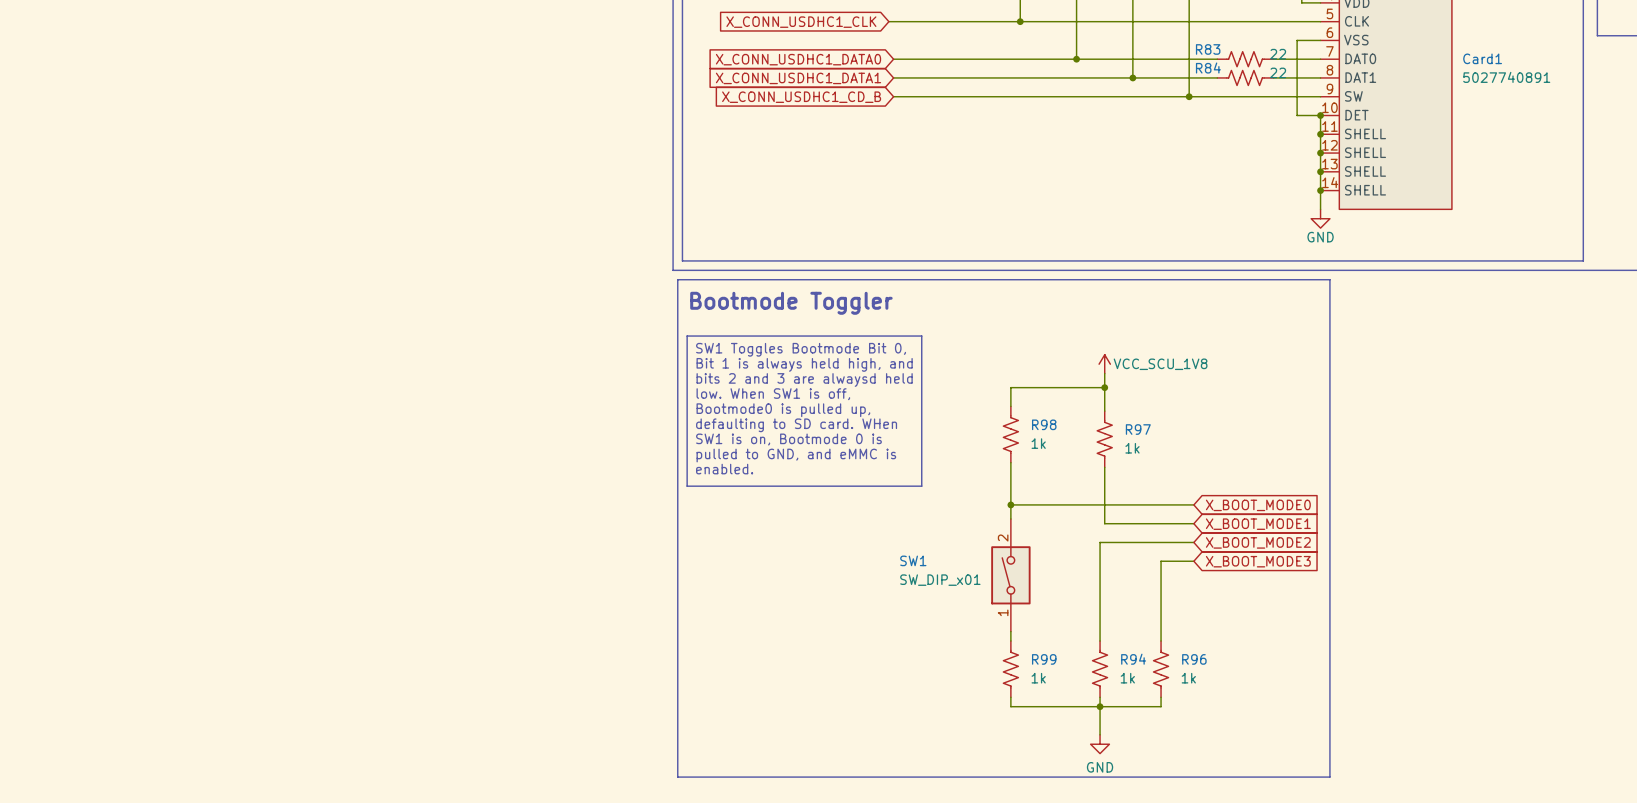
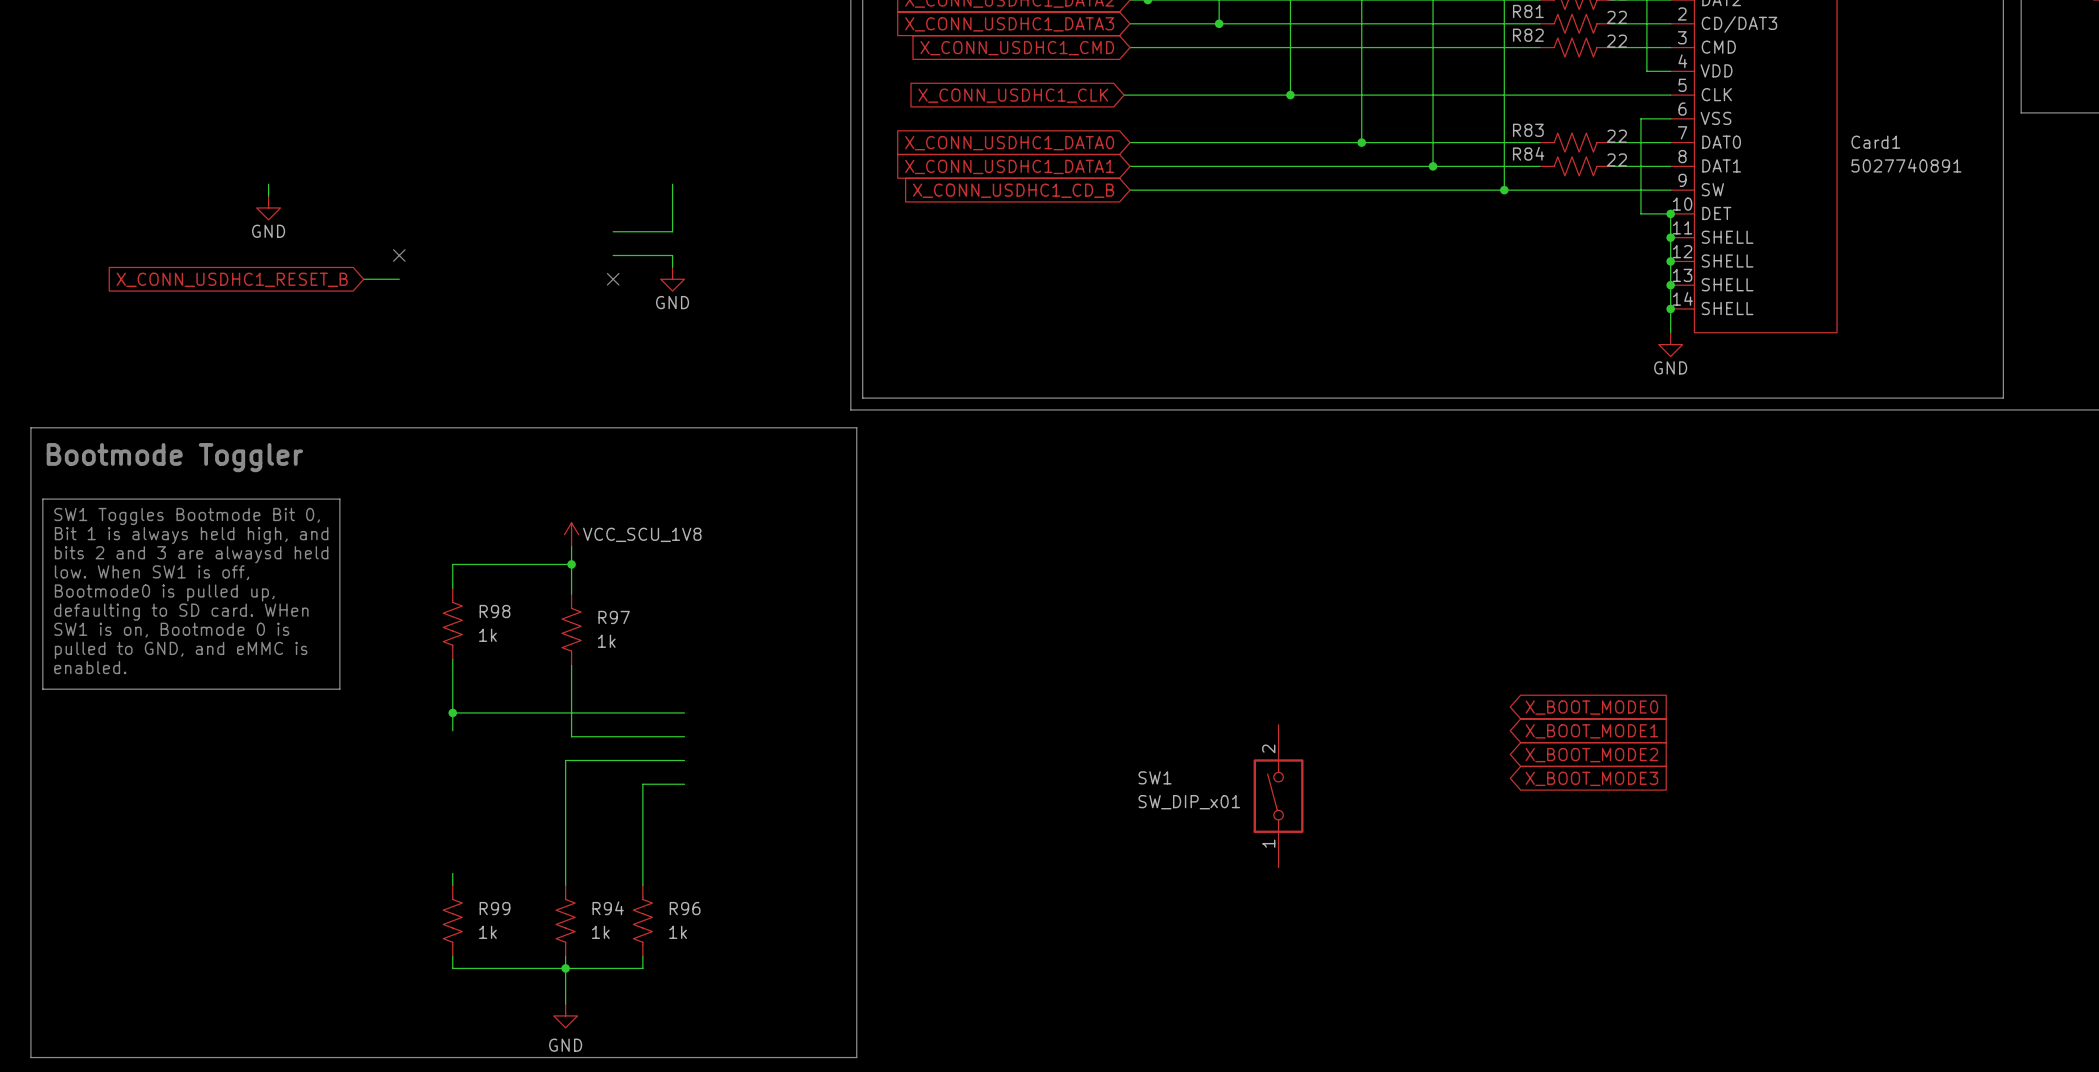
wire: none -> (268, 184) (268, 196)
wire: none -> (672, 184) (672, 231) (613, 231)
power symbol: none -> GND (268, 207)
no-connect mark: none -> (399, 255)
wire: none -> (613, 255) (672, 255) (672, 267)
global label: none -> X_CONN_USDHC1_RESET_B (232, 279)
wire: none -> (363, 279) (399, 279)
no-connect mark: none -> (613, 279)
power symbol: none -> GND (672, 279)
line: (677, 284) (677, 279) (1329, 279) (1329, 777) (677, 777) -> (856, 427) (30, 427) (30, 1057) (856, 1057) (856, 1051)
text: Bootmode Toggler (791, 303) -> none
text: none -> Bootmode Toggler (174, 457)
line: (687, 336) (921, 336) (921, 486) (687, 486) (687, 336) -> none
line: none -> (42, 499) (339, 499) (339, 689) (42, 689) (42, 499)
text: SW1 Toggles Bootmode Bit 0, (801, 349) -> none
text: none -> SW1 Toggles Bootmode Bit 0, (187, 516)
text: Bit 1 is always held high, and (804, 364) -> none
power symbol: VCC_SCU_1V8 (1104, 364) -> none
power symbol: none -> VCC_SCU_1V8 (571, 534)
text: none -> Bit 1 is always held high, and (191, 535)
wire: (1104, 373) (1104, 411) -> none
wire: none -> (571, 546) (571, 594)
text: bits 2 and 3 are alwaysd held (804, 379) -> none
text: none -> bits 2 and 3 are alwaysd held (191, 554)
wire: (1104, 387) (1010, 387) (1010, 406) -> none
junction: (1104, 387) -> none
wire: none -> (571, 564) (452, 564) (452, 588)
junction: none -> (571, 564)
text: low. When SW1 is off, (773, 394) -> none
text: none -> low. When SW1 is off, (151, 572)
text: Bootmode0 is pulled up, (783, 410) -> none
text: none -> Bootmode0 is pulled up, (164, 593)
text: defaulting to SD card. WHen (796, 425) -> none
text: none -> defaulting to SD card. WHen (181, 612)
R98 position: (1010, 434) -> (452, 623)
text: SW1 is on, Bootmode 0 is (788, 439) -> none
R97 position: (1104, 439) -> (571, 629)
text: none -> SW1 is on, Bootmode 0 is (171, 630)
text: pulled to GND, and eMMC is (796, 455) -> none
text: none -> pulled to GND, and eMMC is (181, 650)
wire: (1010, 462) (1010, 519) -> none
wire: none -> (452, 659) (452, 730)
wire: (1104, 467) (1104, 523) (1193, 523) -> none
text: enabled. (724, 469) -> none
wire: none -> (571, 665) (571, 736) (684, 736)
text: none -> enabled. (90, 667)
wire: (1010, 504) (1193, 504) -> none
junction: (1010, 504) -> none
wire: none -> (452, 712) (684, 712)
junction: none -> (452, 712)
wire: (1193, 542) (1100, 542) (1100, 641) -> none
wire: none -> (684, 760) (565, 760) (565, 885)
wire: (1193, 561) (1161, 561) (1161, 641) -> none
wire: none -> (684, 784) (642, 784) (642, 885)
wire: (1010, 631) (1010, 641) -> none
wire: none -> (452, 873) (452, 885)
R99 position: (1010, 669) -> (452, 920)
R94 position: (1100, 669) -> (565, 920)
R96 position: (1161, 669) -> (642, 920)
wire: (1010, 697) (1010, 706) (1161, 706) (1161, 697) -> none
wire: (1100, 697) (1100, 734) -> none
wire: none -> (452, 956) (452, 968) (642, 968) (642, 956)
wire: none -> (565, 956) (565, 1004)
junction: (1100, 706) -> none
junction: none -> (565, 968)
power symbol: GND (1100, 744) -> none
power symbol: none -> GND (565, 1015)

